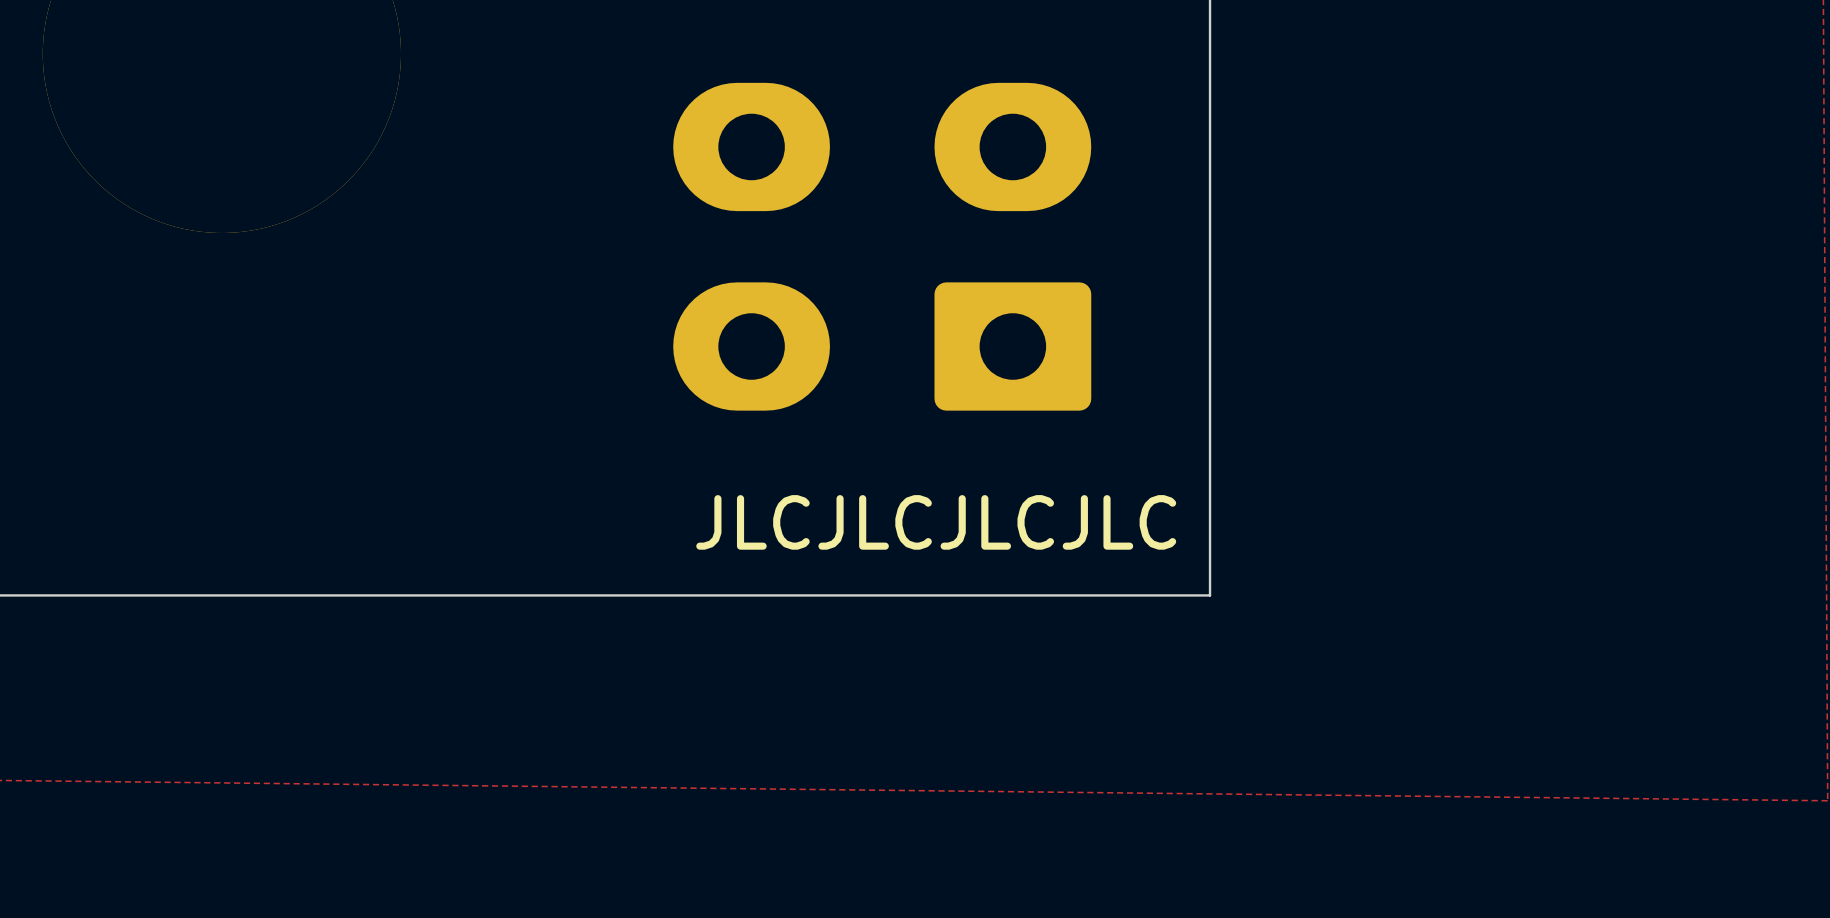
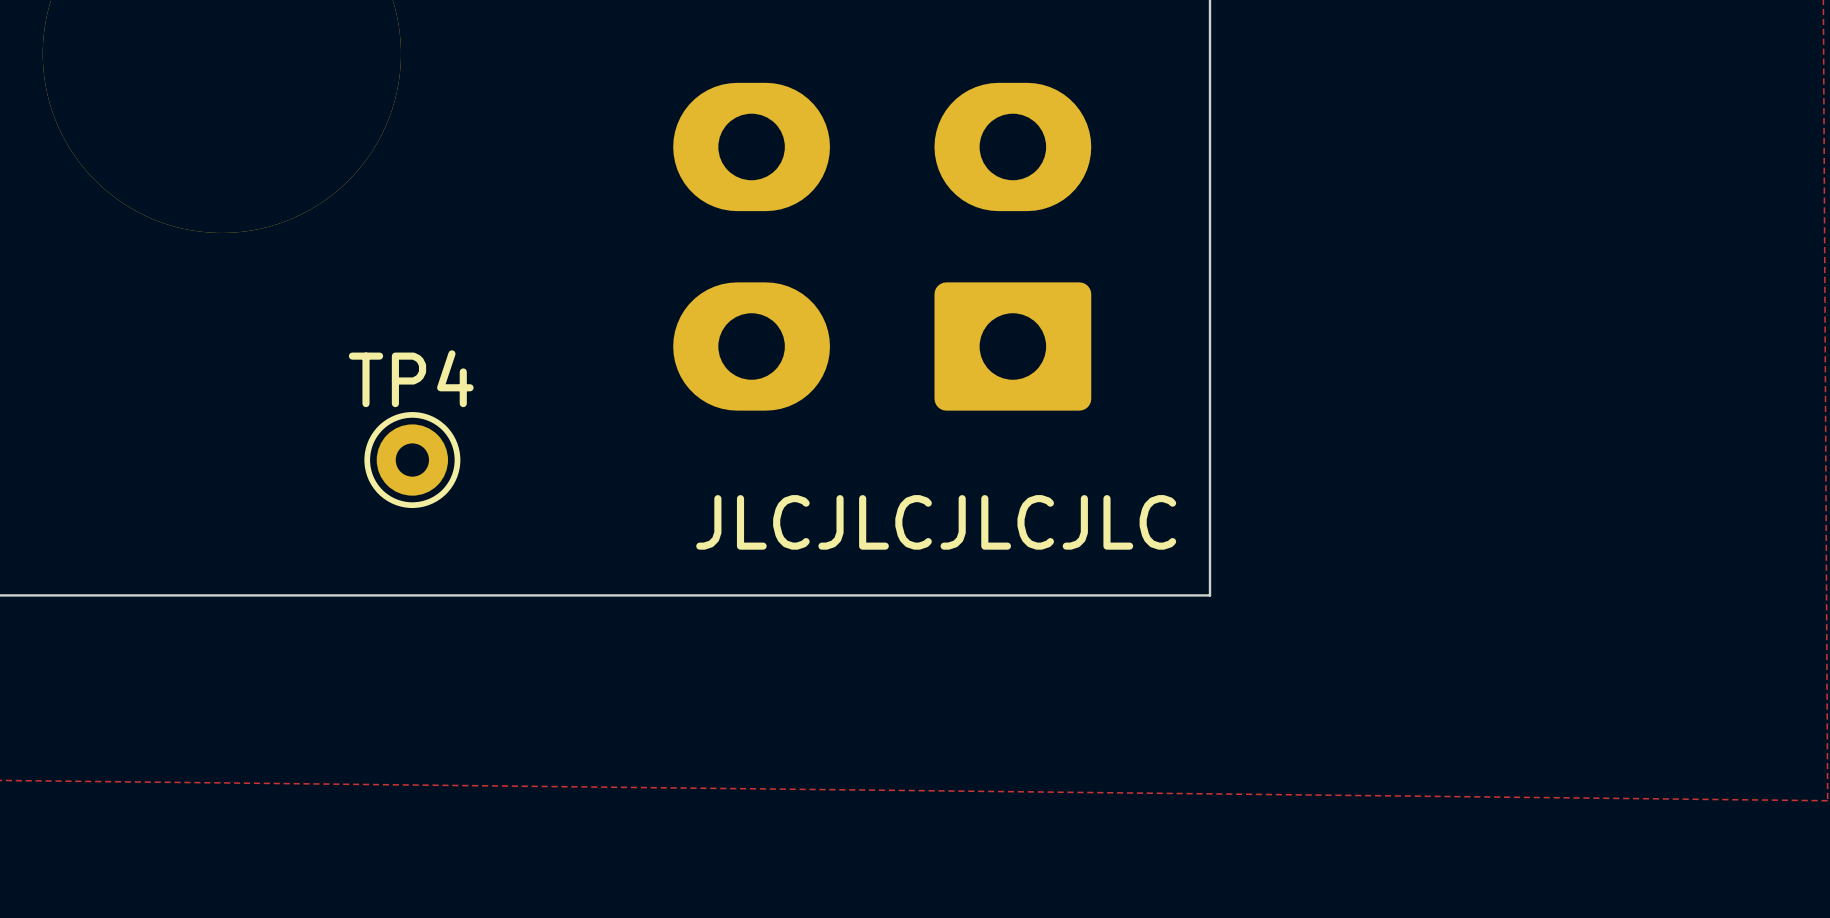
part: none -> (412, 460)

